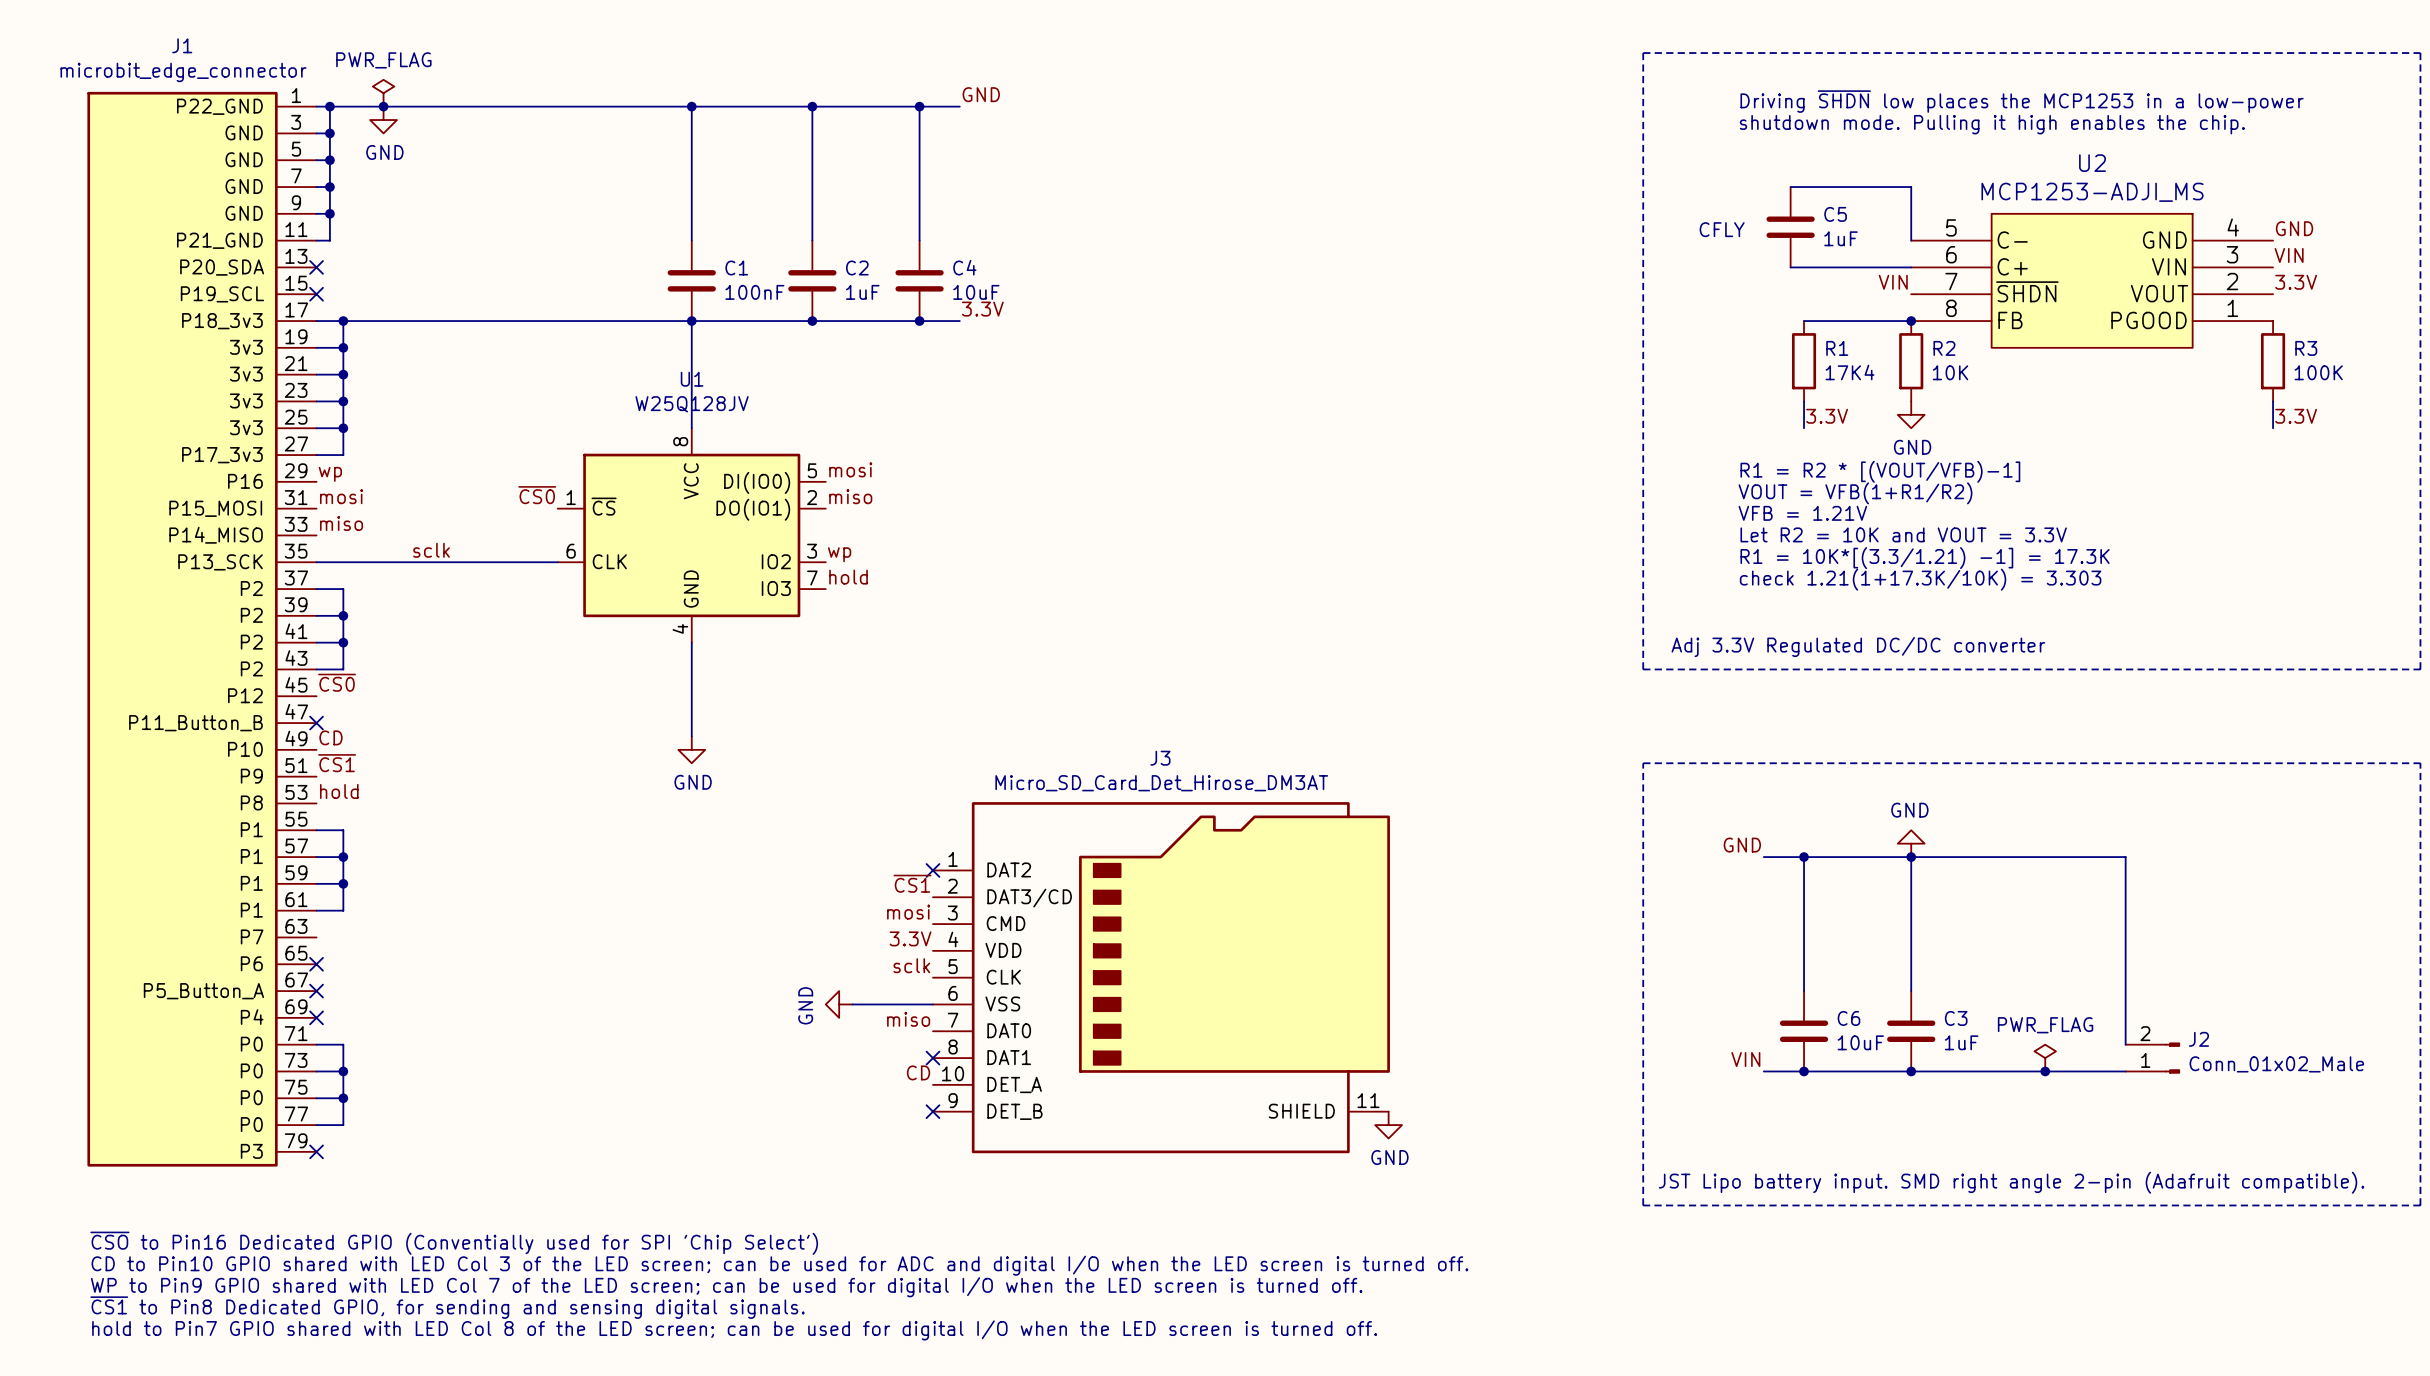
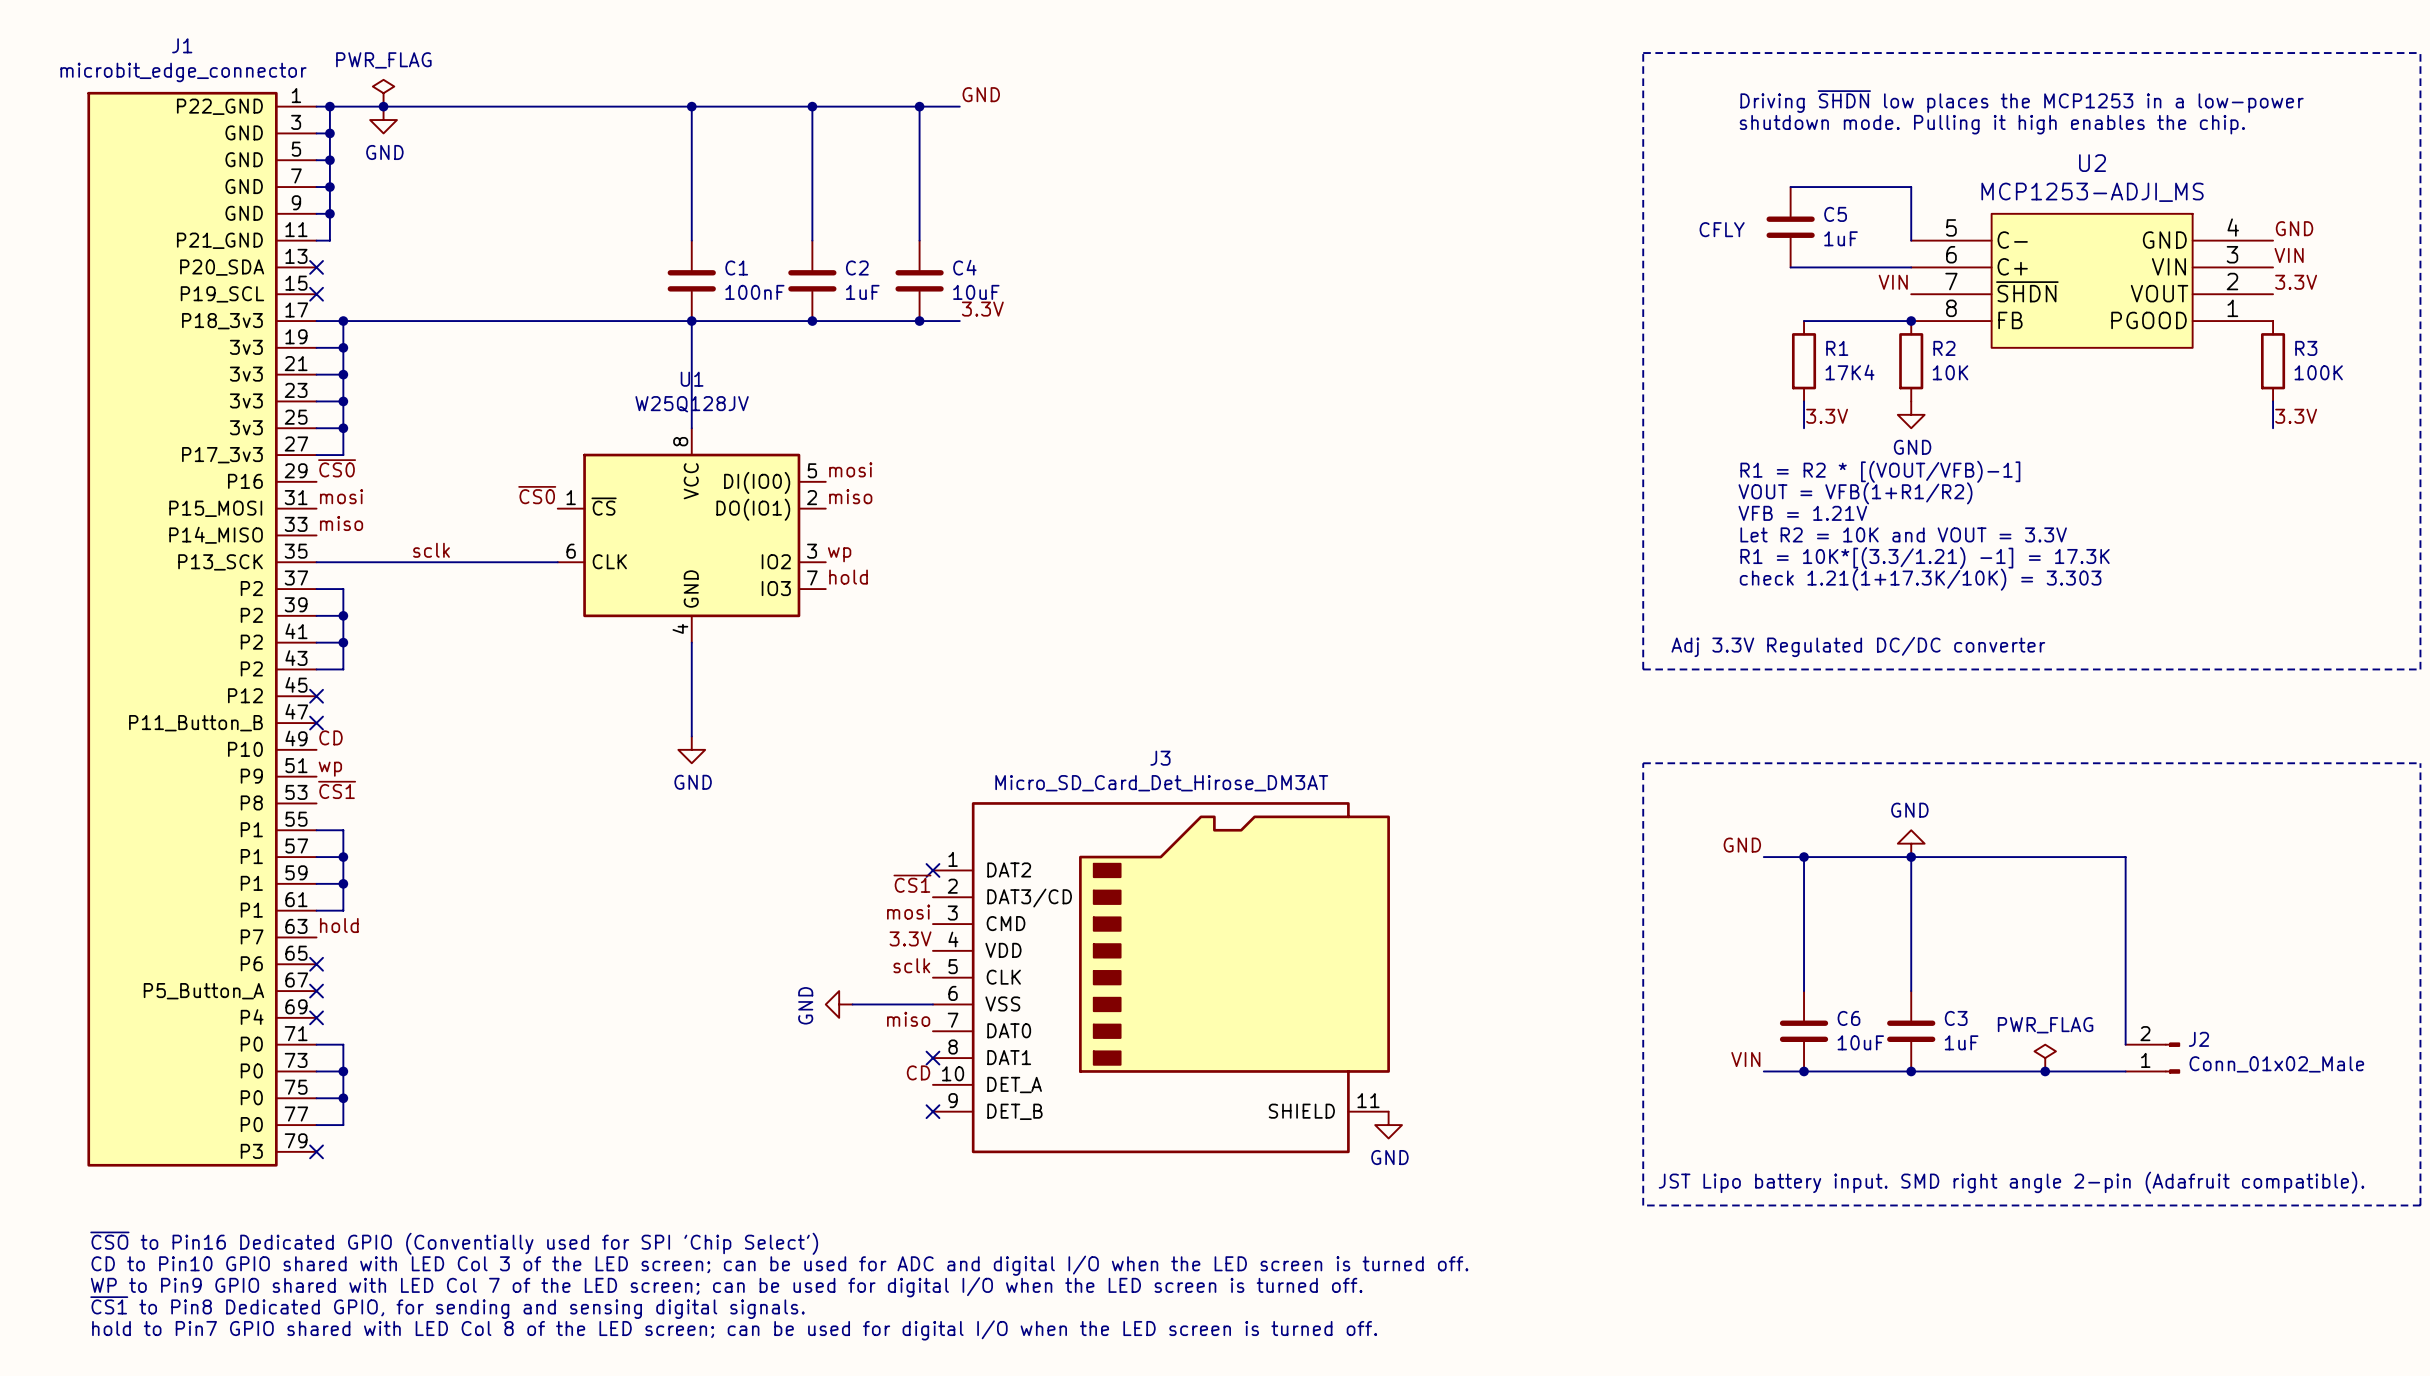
label: wp (330, 474) -> ~{CS0} (337, 468)
label: ~{CS0} (337, 682) -> none
no-connect mark: none -> (316, 696)
label: ~{CS1} (337, 763) -> wp (330, 769)
label: hold (339, 791) -> ~{CS1} (337, 789)
label: none -> hold (339, 925)

